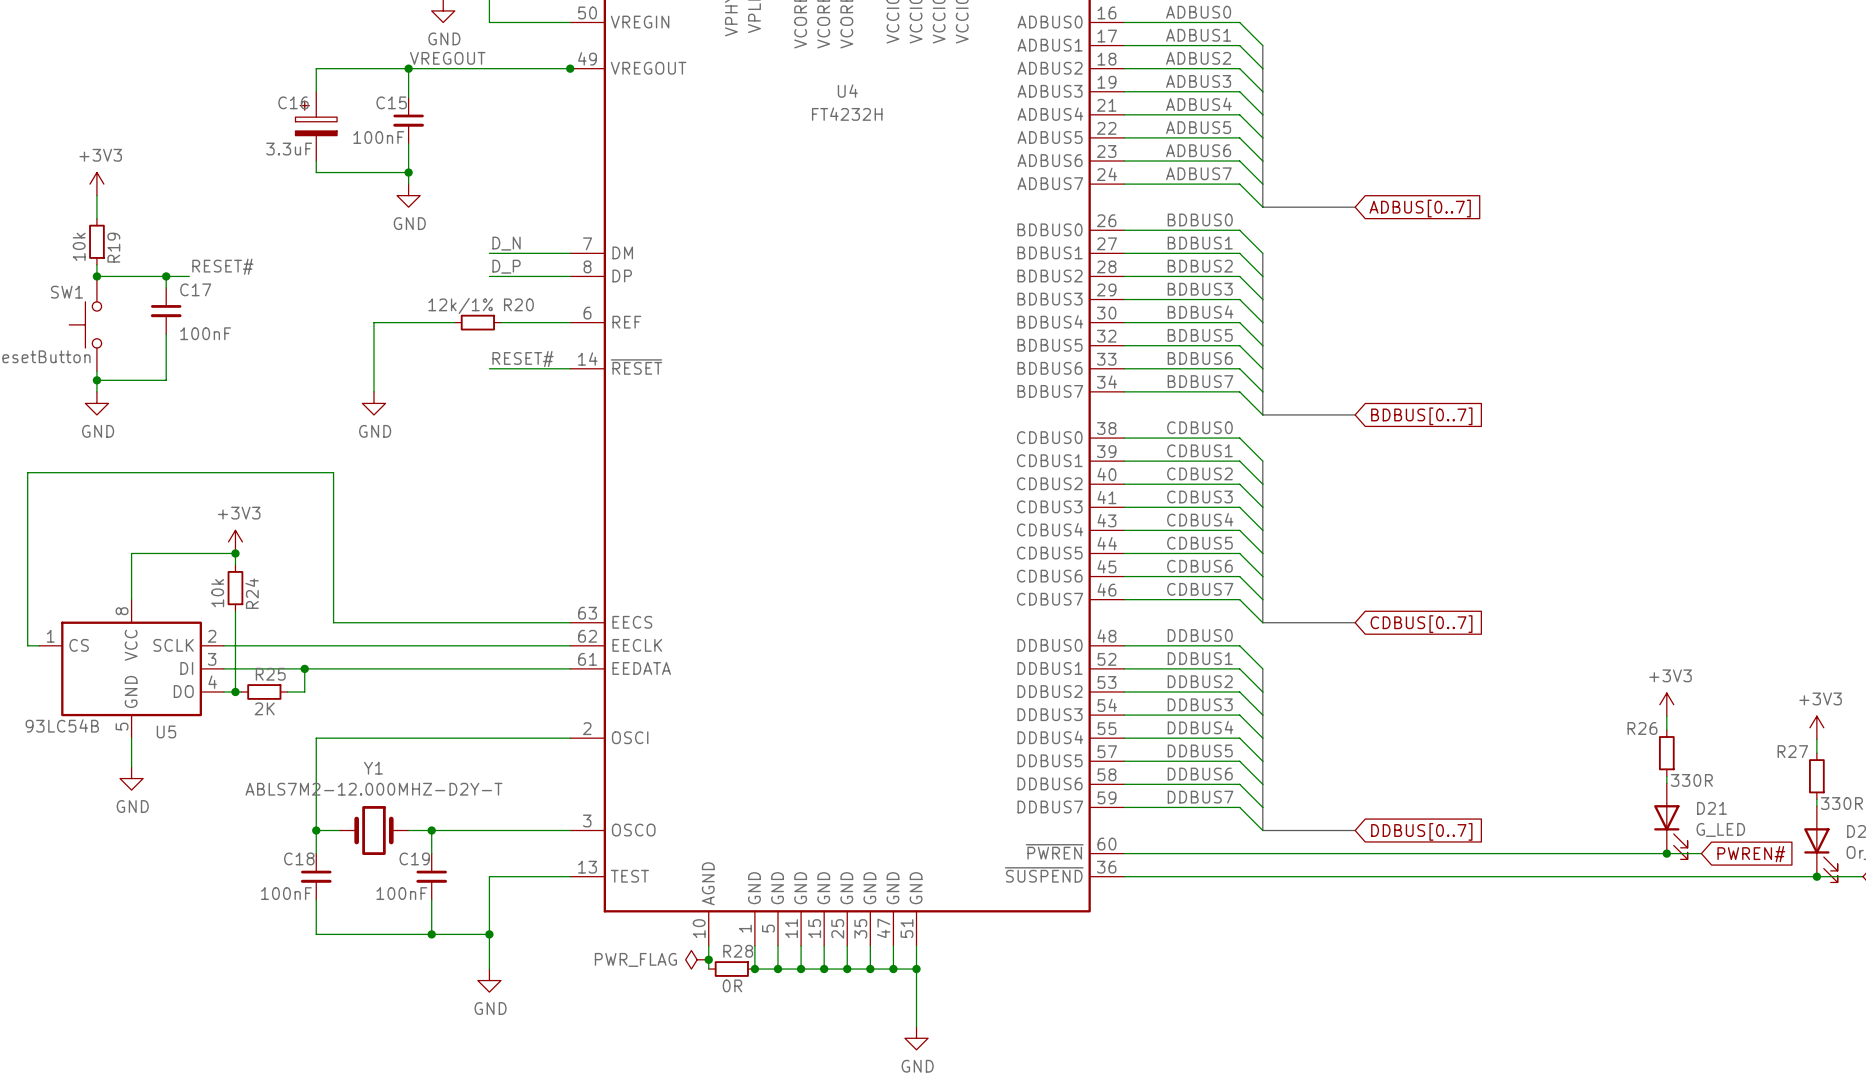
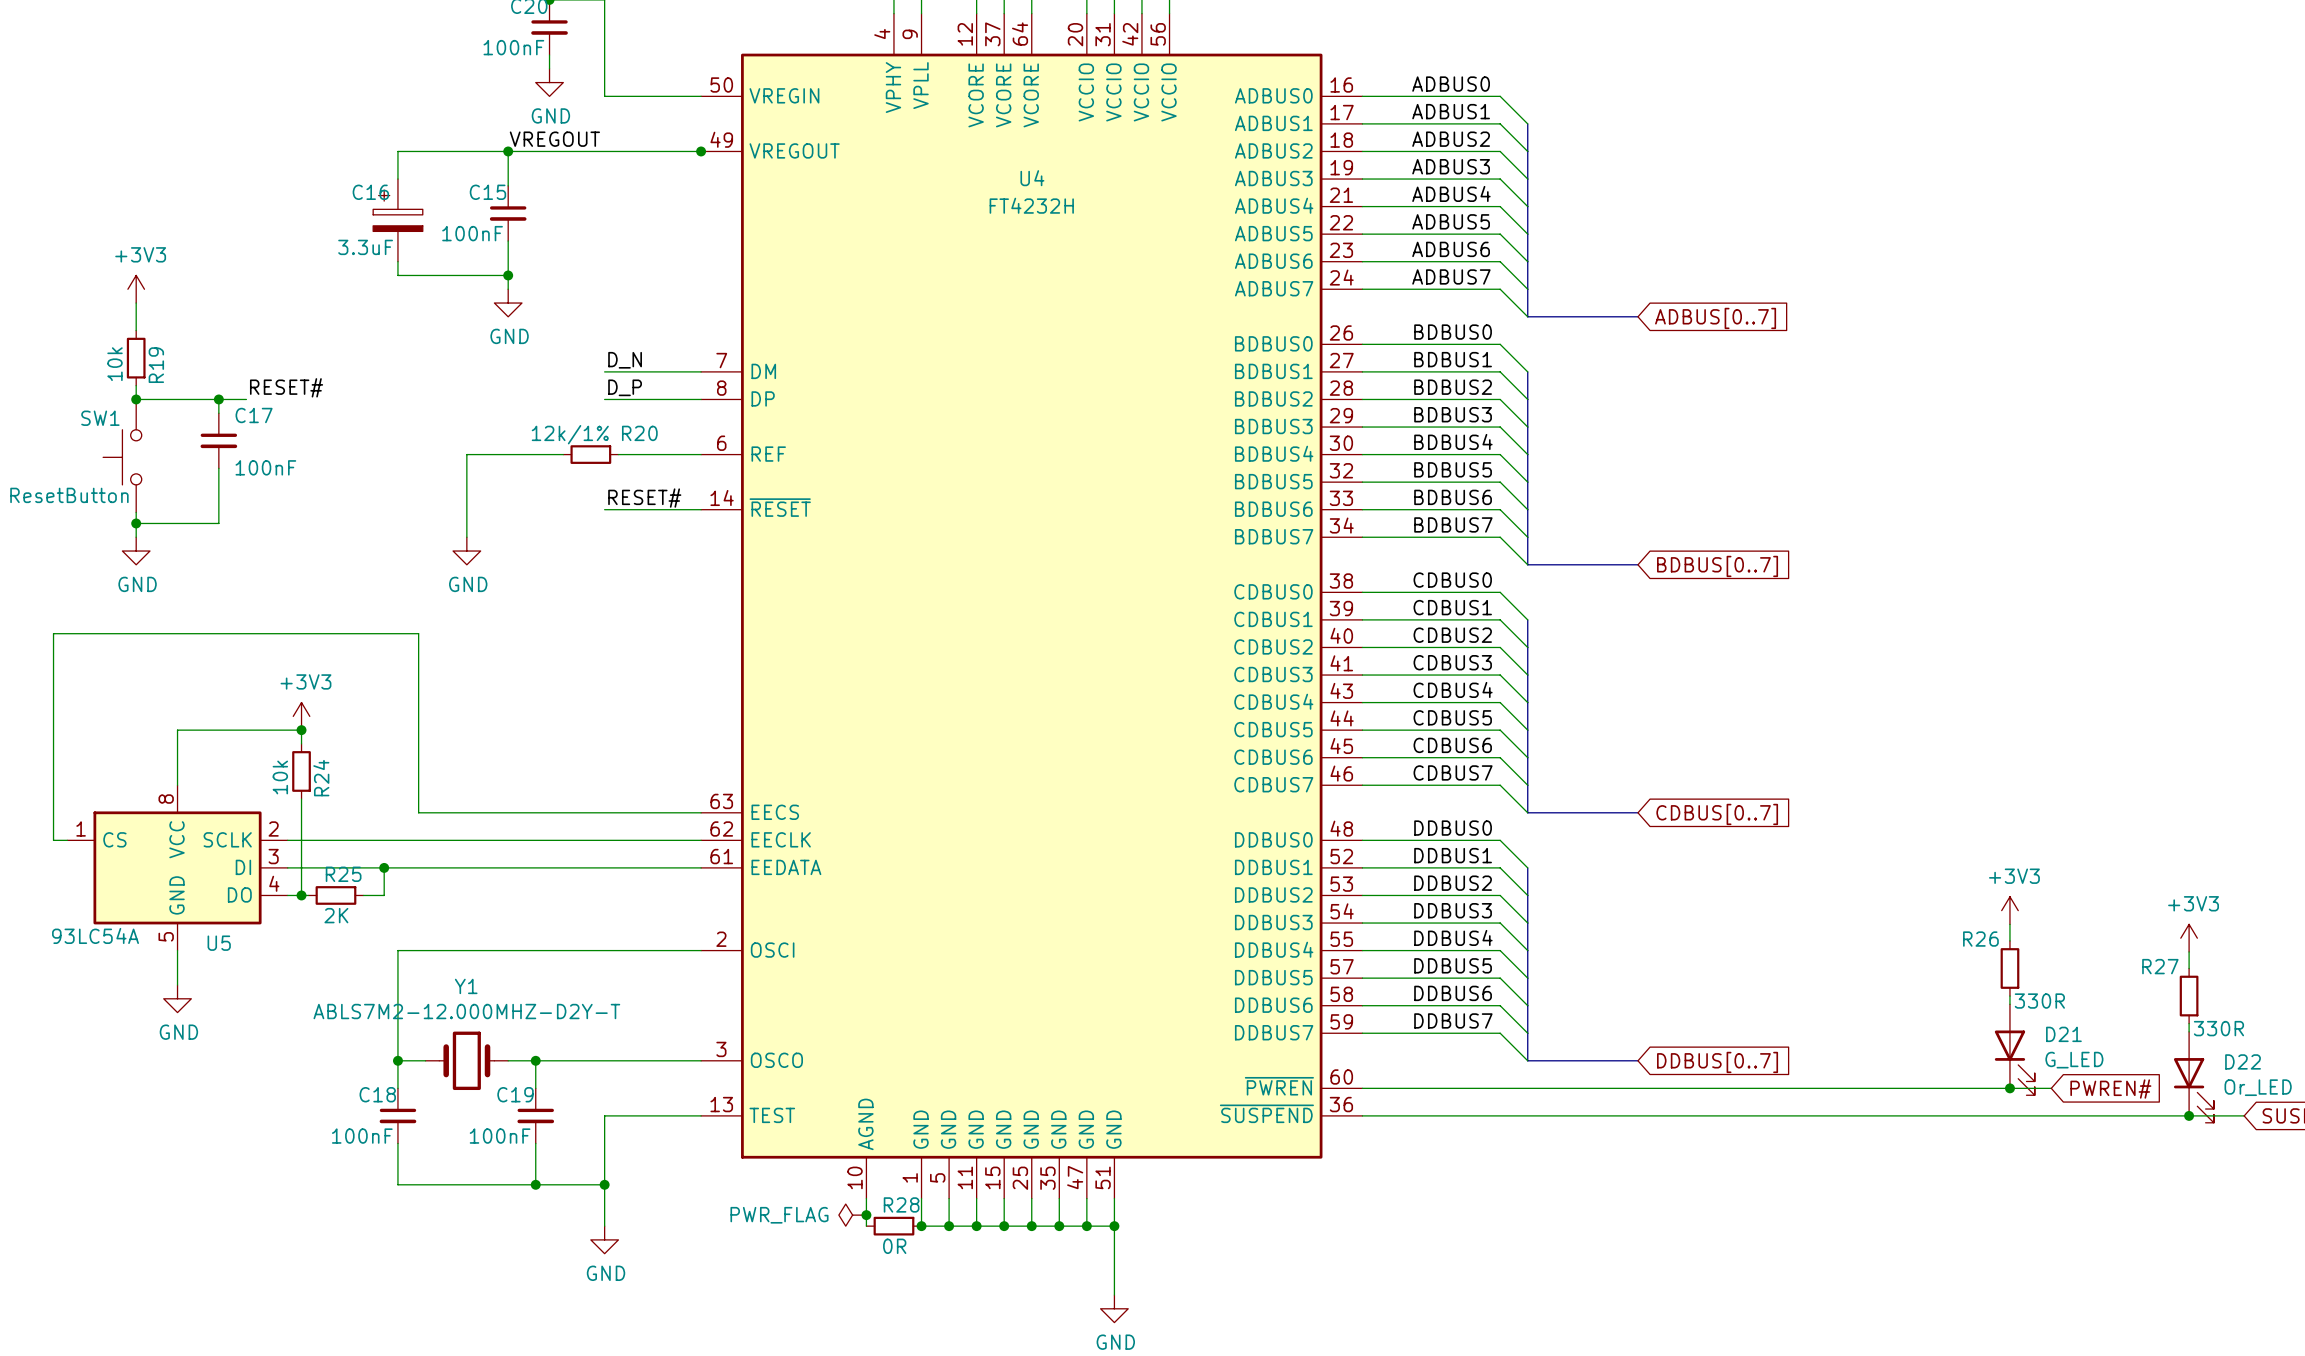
U5 value: 93LC54B (62, 725) -> 93LC54A (95, 935)

